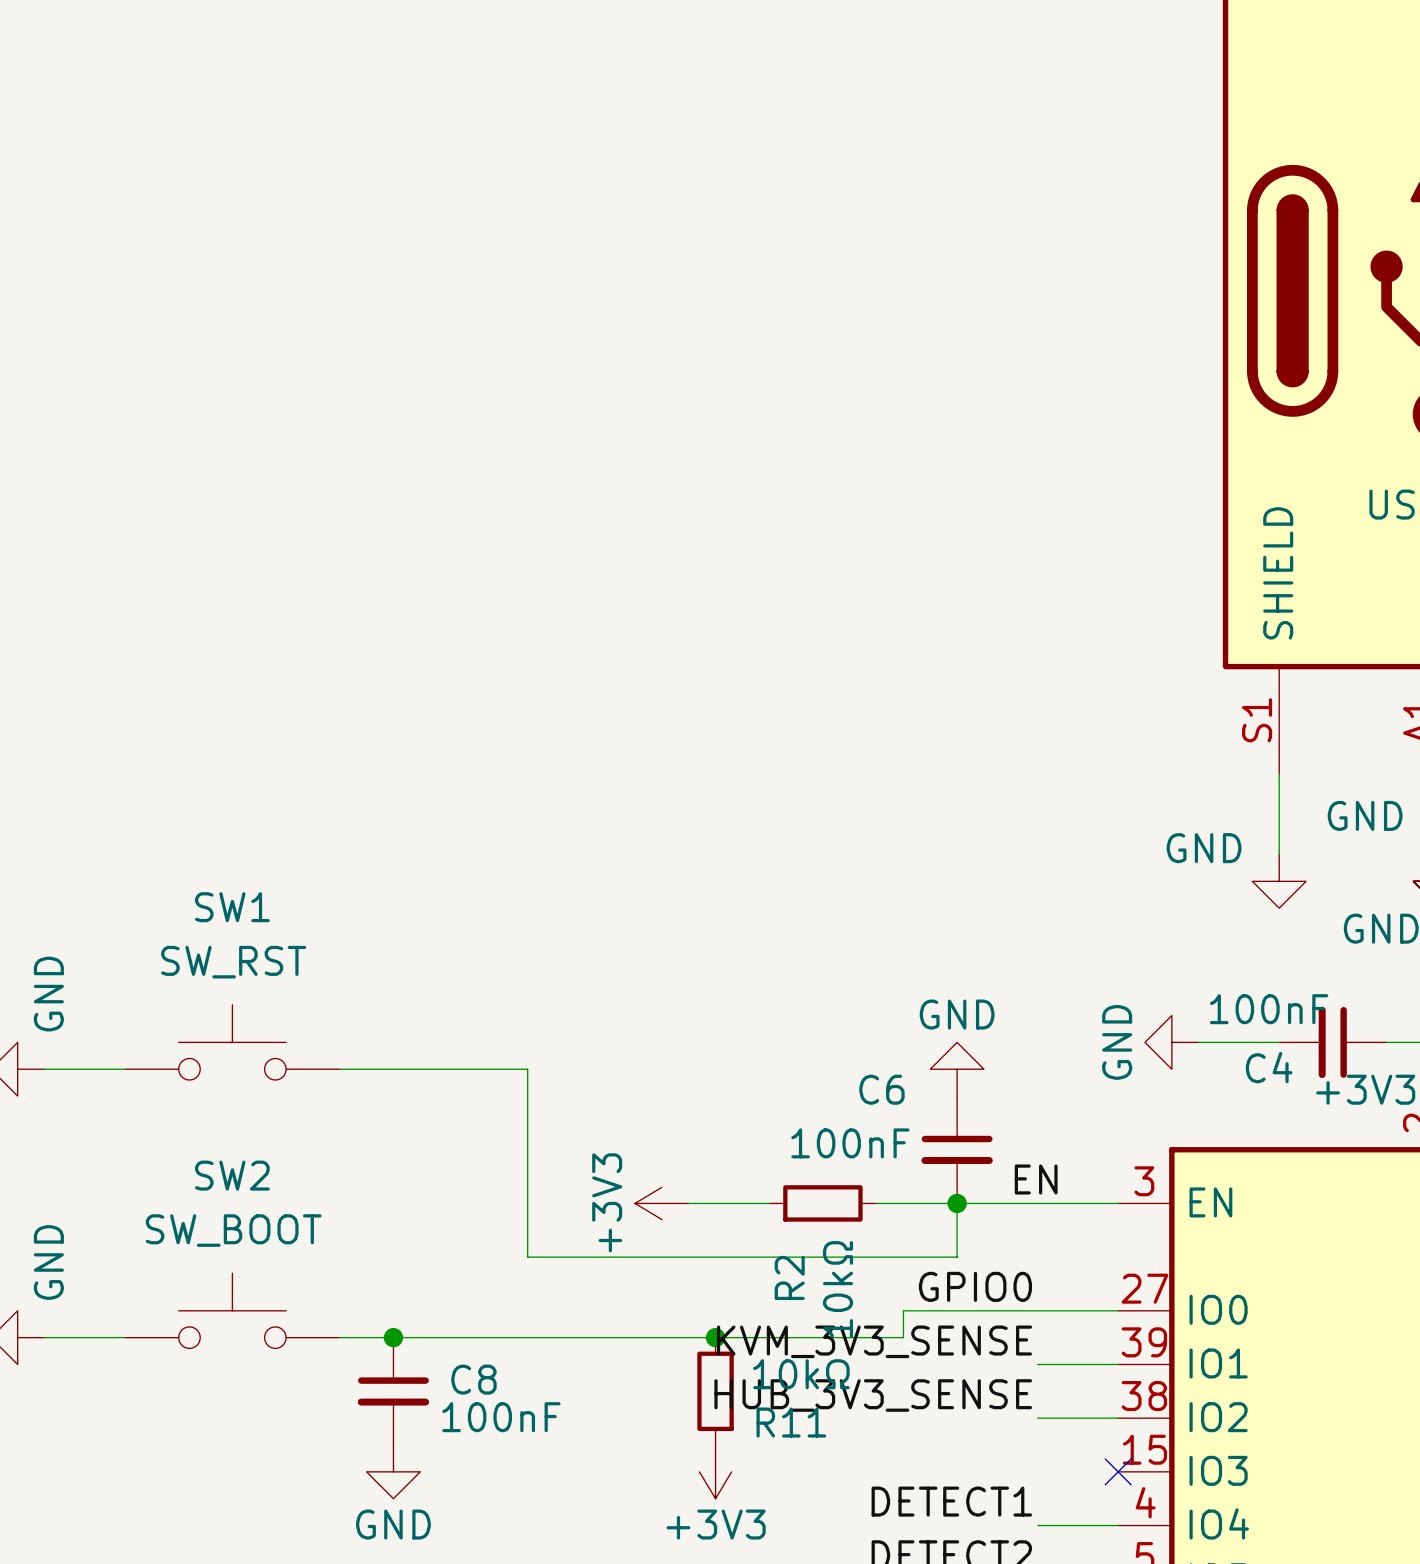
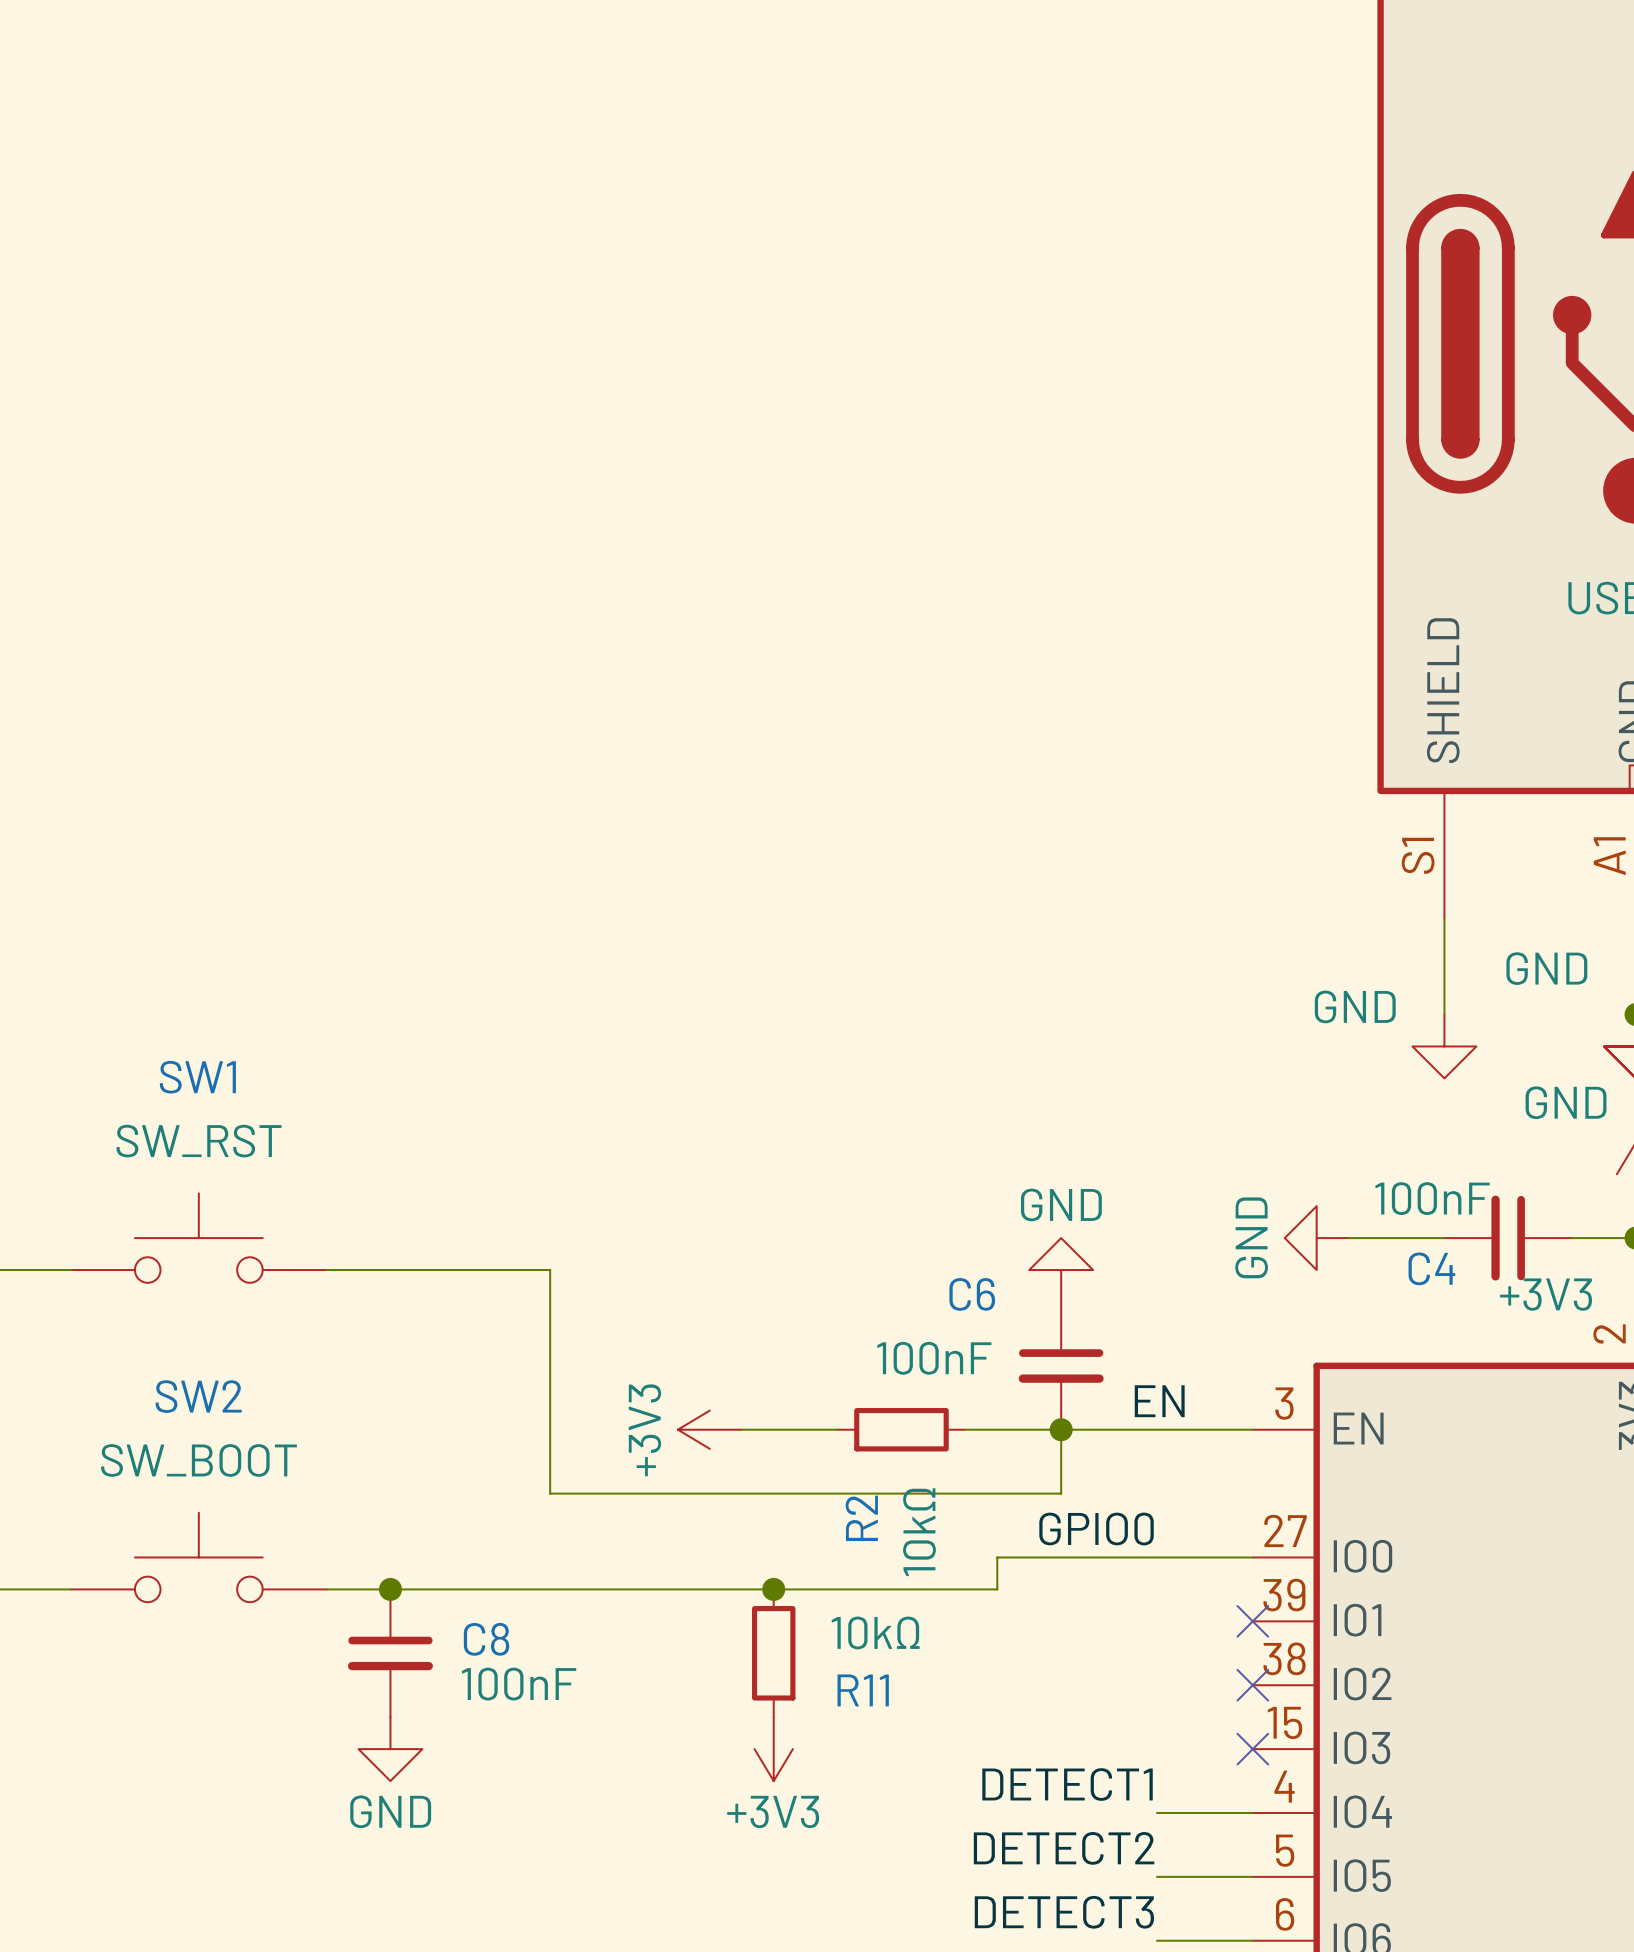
label: KVM_3V3_SENSE (874, 1341) -> none
wire: (1037, 1364) (1118, 1364) -> none
no-connect mark: none -> (1252, 1621)
label: HUB_3V3_SENSE (873, 1395) -> none
wire: (1037, 1418) (1118, 1418) -> none
no-connect mark: none -> (1252, 1685)

